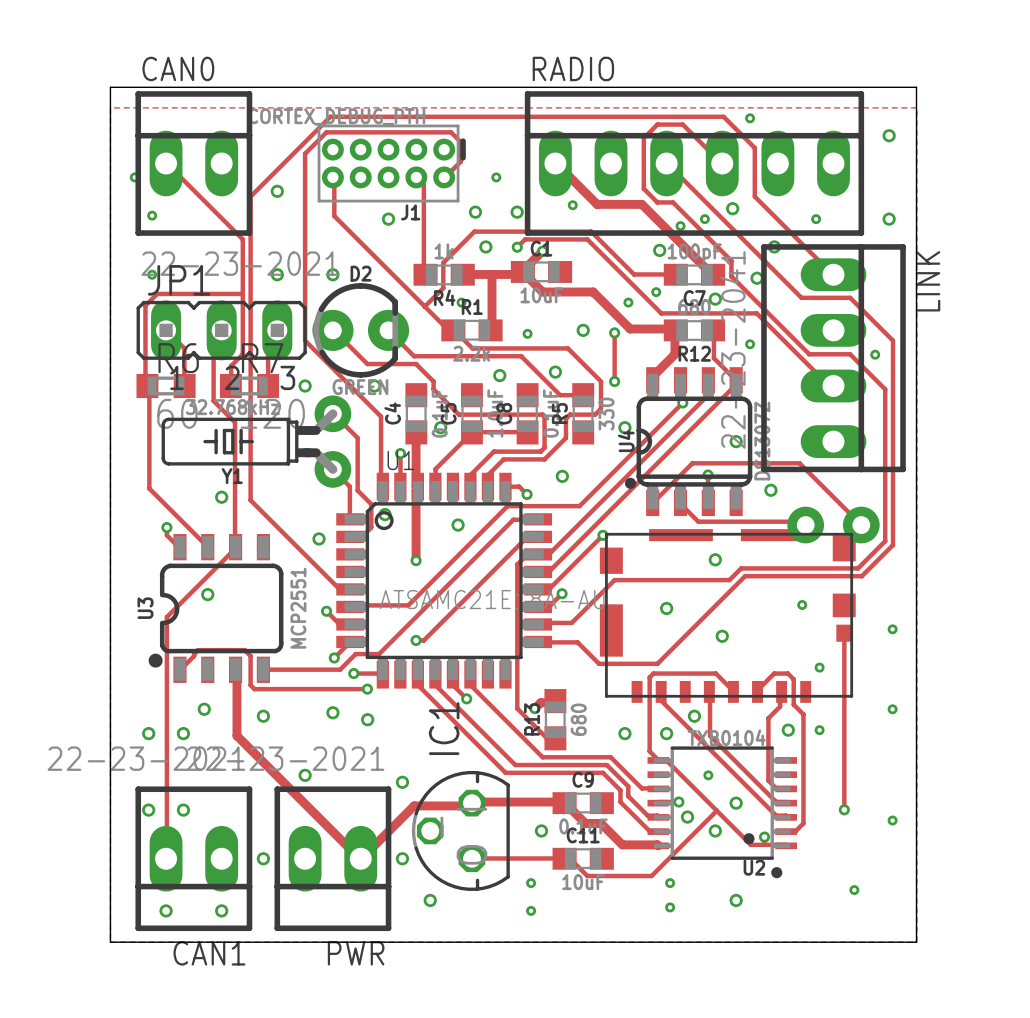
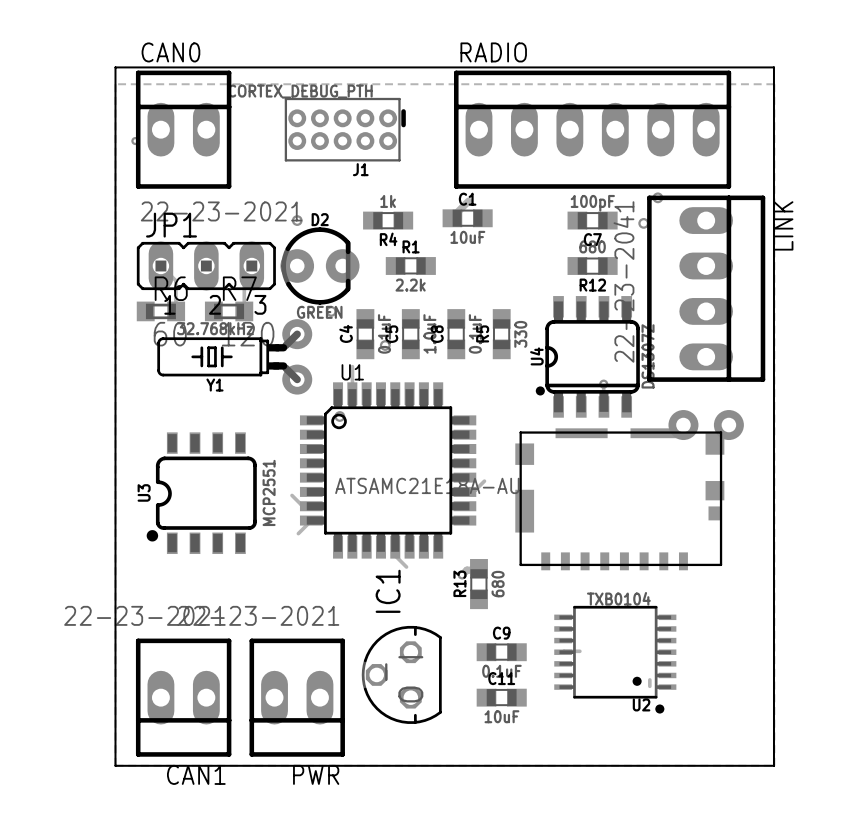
via: (750, 118) -> none
via: (889, 135) -> none
track: (166, 163) (242, 239) (242, 354) (231, 365) (230, 385) -> none
track: (555, 163) (597, 204) (641, 204) (713, 274) -> none
track: (666, 163) (801, 297) (850, 297) (893, 340) (893, 545) (861, 576) (745, 576) (657, 663) (599, 663) (577, 642) (538, 641) -> none
track: (722, 163) (682, 124) (657, 124) (643, 138) (643, 188) (657, 202) (673, 202) (731, 260) (731, 276) (809, 354) (850, 354) (885, 389) (885, 541) (857, 568) (741, 568) (729, 580) (614, 580) (571, 622) (538, 624) -> none
track: (332, 177) (334, 216) (447, 328) (453, 328) (472, 348) (567, 348) (601, 381) (601, 408) (595, 414) (569, 414) (565, 418) (565, 437) (544, 459) (503, 459) (488, 474) (488, 486) -> none
track: (416, 177) (423, 184) (423, 274) (425, 274) -> none
track: (444, 177) (460, 161) (460, 142) (451, 132) (326, 132) (305, 153) (305, 340) (381, 416) (381, 486) (382, 486) -> none
via: (496, 177) -> none
via: (277, 191) -> none
via: (572, 205) -> none
via: (732, 208) -> none
via: (475, 212) -> none
via: (517, 212) -> none
via: (152, 215) -> none
via: (388, 219) -> none
via: (704, 219) -> none
via: (816, 219) -> none
via: (889, 219) -> none
via: (680, 226) -> none
via: (485, 246) -> none
track: (517, 247) (525, 239) (587, 239) (661, 313) (756, 313) (828, 385) (833, 385) -> none
via: (517, 247) -> none
via: (659, 250) -> none
via: (542, 251) -> none
via: (152, 274) -> none
via: (277, 274) -> none
track: (462, 274) (519, 274) (522, 271) (542, 291) (593, 291) (630, 328) (675, 330) (674, 354) (653, 375) (652, 380) -> none
track: (491, 274) (490, 330) -> none
track: (675, 274) (634, 274) (591, 231) (474, 231) (443, 262) (443, 288) (424, 306) -> none
track: (833, 274) (754, 196) (754, 147) (723, 116) (330, 116) (250, 196) (250, 500) (338, 587) (350, 589) -> none
via: (656, 292) -> none
track: (242, 293) (157, 293) (145, 305) (145, 385) (149, 387) (149, 488) (207, 547) -> none
via: (715, 299) -> none
via: (461, 302) -> none
via: (628, 302) -> none
track: (221, 330) (213, 338) (213, 401) (235, 422) (235, 547) (166, 617) (166, 858) -> none
track: (332, 330) (367, 364) (416, 364) (433, 381) (433, 389) (458, 414) (542, 414) (544, 416) (544, 447) (540, 451) (493, 451) (470, 474) (470, 486) -> none
track: (388, 330) (414, 356) (521, 356) (560, 395) (583, 395) -> none
via: (583, 330) -> none
track: (713, 330) (713, 358) (736, 380) (735, 385) (550, 570) (538, 571) -> none
track: (614, 332) (614, 381) -> none
via: (614, 332) -> none
via: (527, 333) -> none
via: (750, 344) -> none
via: (875, 354) -> none
via: (555, 372) -> none
via: (499, 375) -> none
track: (708, 380) (708, 395) (550, 552) (527, 554) (517, 564) (517, 708) (546, 737) (555, 738) -> none
via: (614, 381) -> none
via: (305, 385) -> none
track: (682, 402) (579, 506) (507, 506) (408, 605) (350, 606) -> none
via: (682, 402) -> none
track: (332, 413) (357, 437) (357, 490) (371, 504) (371, 527) (363, 535) (350, 536) -> none
via: (624, 427) -> none
track: (416, 432) (416, 486) (417, 486) (416, 490) (416, 560) -> none
track: (527, 432) (471, 432) (435, 469) (435, 486) -> none
via: (736, 441) -> none
via: (400, 453) -> none
track: (332, 469) (349, 486) (350, 519) -> none
via: (562, 476) -> none
track: (505, 486) (519, 486) (527, 494) -> none
via: (770, 490) -> none
via: (527, 494) -> none
via: (221, 497) -> none
track: (652, 502) (692, 463) (799, 463) (861, 525) -> none
track: (680, 502) (698, 521) (805, 521) (807, 523) (805, 525) -> none
track: (538, 519) (513, 519) (379, 654) (355, 654) (340, 669) (263, 669) -> none
via: (458, 525) -> none
track: (166, 527) (166, 535) (179, 547) -> none
via: (166, 527) -> none
track: (602, 535) (550, 587) (538, 589) -> none
via: (602, 535) -> none
track: (538, 536) (527, 537) (423, 640) (416, 640) -> none
via: (319, 538) -> none
via: (715, 559) -> none
via: (416, 560) -> none
via: (562, 593) -> none
via: (207, 594) -> none
via: (802, 604) -> none
via: (666, 608) -> none
via: (326, 611) -> none
via: (892, 629) -> none
track: (844, 633) (844, 809) -> none
via: (722, 636) -> none
via: (416, 640) -> none
via: (334, 657) -> none
via: (819, 667) -> none
track: (179, 669) (198, 650) (244, 650) (250, 656) (250, 685) (254, 689) (367, 689) -> none
track: (235, 669) (236, 735) (359, 858) (414, 805) (468, 805) (472, 802) (560, 802) (565, 803) (585, 823) (601, 823) (622, 844) (658, 845) -> none
track: (353, 673) (382, 674) -> none
via: (353, 673) -> none
track: (417, 674) (418, 685) (505, 772) (602, 772) (620, 790) (620, 802) (649, 831) (658, 831) -> none
track: (435, 674) (435, 685) (515, 765) (606, 765) (628, 786) (628, 796) (647, 815) (657, 815) (658, 817) -> none
track: (470, 674) (470, 685) (542, 757) (610, 757) (641, 788) (658, 788) -> none
via: (367, 689) -> none
track: (661, 691) (661, 700) (776, 815) (785, 815) (786, 817) -> none
track: (709, 691) (710, 735) (776, 802) (786, 803) -> none
track: (733, 691) (715, 673) (653, 673) (649, 677) (649, 751) (659, 761) (667, 761) (750, 844) (786, 845) -> none
track: (757, 691) (774, 673) (787, 673) (793, 679) (793, 704) (803, 714) (803, 823) (795, 831) (786, 831) -> none
track: (781, 691) (780, 706) (768, 718) (768, 780) (776, 788) (786, 788) -> none
via: (466, 698) -> none
via: (204, 709) -> none
via: (892, 709) -> none
via: (332, 712) -> none
via: (263, 716) -> none
via: (694, 716) -> none
via: (367, 719) -> none
via: (788, 730) -> none
via: (819, 730) -> none
via: (148, 733) -> none
via: (183, 733) -> none
via: (624, 733) -> none
via: (666, 733) -> none
via: (305, 775) -> none
via: (708, 775) -> none
via: (402, 782) -> none
via: (678, 802) -> none
via: (736, 803) -> none
via: (844, 809) -> none
via: (148, 810) -> none
via: (183, 810) -> none
track: (716, 810) (651, 876) (587, 876) (571, 860) (564, 858) (471, 858) -> none
via: (687, 817) -> none
via: (892, 820) -> none
via: (541, 830) -> none
via: (715, 830) -> none
via: (764, 837) -> none
via: (263, 858) -> none
via: (402, 858) -> none
via: (531, 883) -> none
via: (670, 883) -> none
via: (854, 890) -> none
via: (430, 900) -> none
via: (736, 900) -> none
via: (670, 907) -> none
via: (166, 910) -> none
via: (221, 910) -> none
via: (531, 910) -> none

